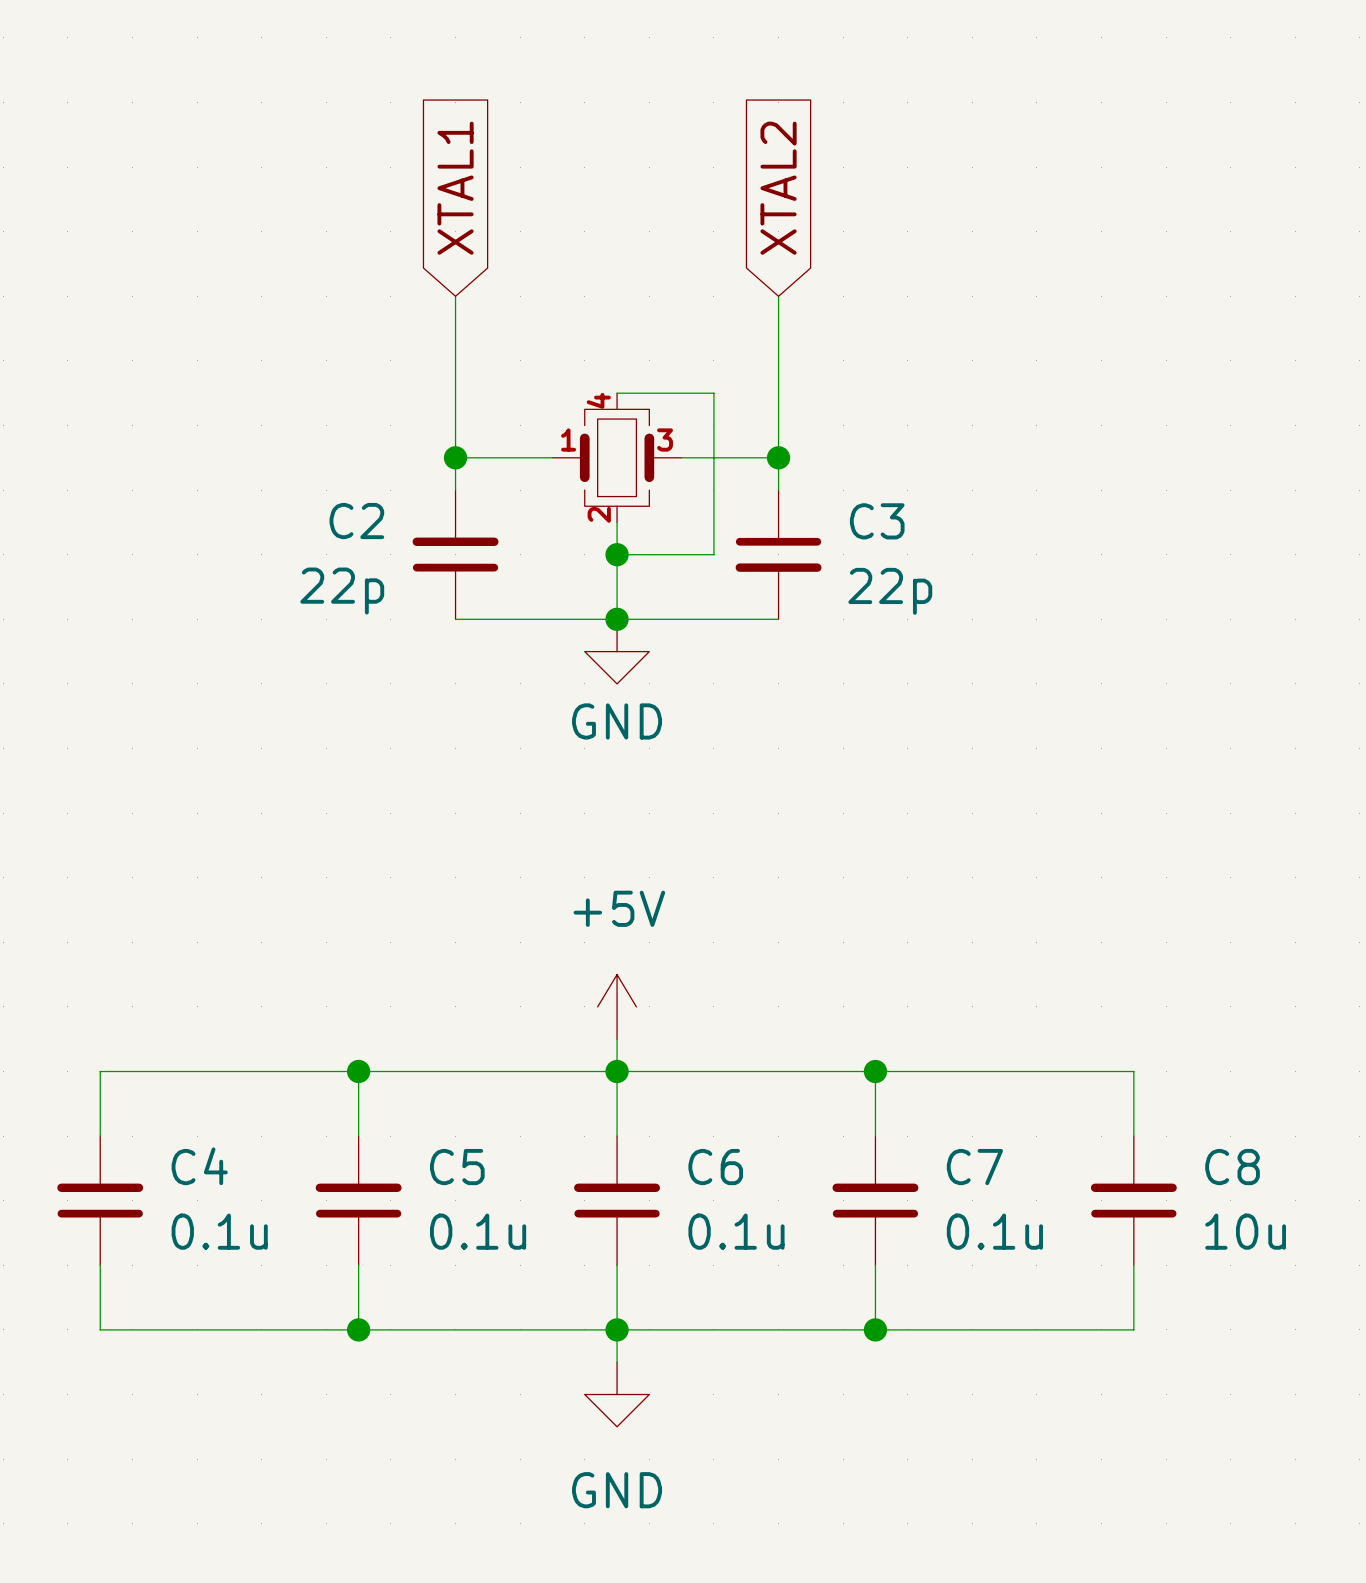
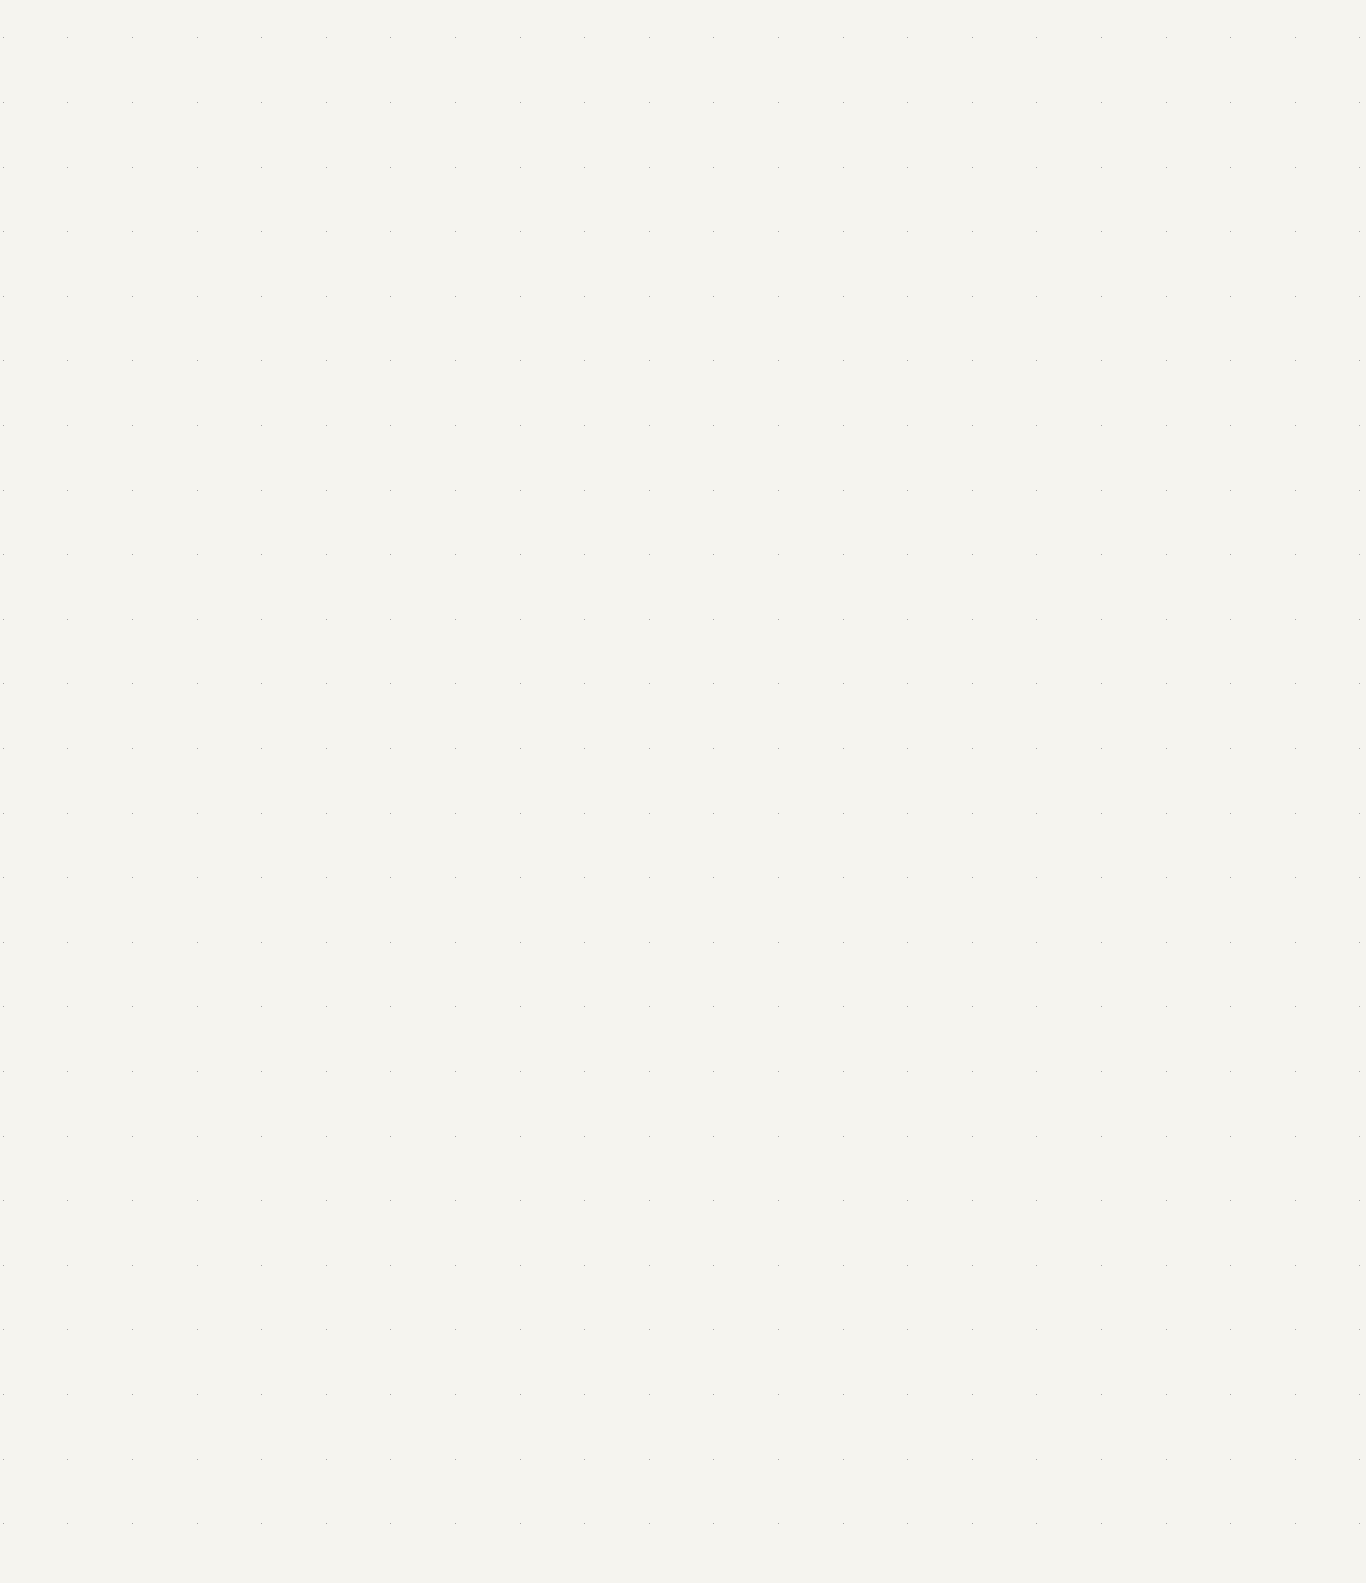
global label: XTAL1 (455, 188) -> none
global label: XTAL2 (778, 188) -> none
wire: (455, 296) (455, 490) -> none
wire: (778, 296) (778, 490) -> none
wire: (617, 393) (713, 393) (713, 554) (617, 554) -> none
wire: (455, 457) (552, 457) -> none
junction: (455, 457) -> none
part: (617, 457) -> none
wire: (681, 457) (778, 457) -> none
junction: (778, 457) -> none
wire: (617, 522) (617, 619) -> none
C2: 22p (455, 554) -> none
junction: (617, 554) -> none
C3: 22p (778, 554) -> none
wire: (455, 619) (778, 619) -> none
junction: (617, 619) -> none
power symbol: GND (617, 651) -> none
power symbol: +5V (617, 1006) -> none
wire: (617, 1039) (617, 1136) -> none
wire: (358, 1071) (358, 1136) -> none
junction: (358, 1071) -> none
junction: (617, 1071) -> none
wire: (875, 1071) (875, 1136) -> none
junction: (875, 1071) -> none
wire: (100, 1136) (100, 1071) (1133, 1071) (1133, 1136) -> none
C4: 0.1u (100, 1200) -> none
C5: 0.1u (358, 1200) -> none
C6: 0.1u (617, 1200) -> none
C7: 0.1u (875, 1200) -> none
C8: 10u (1133, 1200) -> none
wire: (100, 1265) (100, 1329) (1133, 1329) (1133, 1265) -> none
wire: (358, 1265) (358, 1329) -> none
wire: (617, 1265) (617, 1362) -> none
wire: (875, 1265) (875, 1329) -> none
junction: (358, 1329) -> none
junction: (617, 1329) -> none
junction: (875, 1329) -> none
power symbol: GND (617, 1394) -> none

